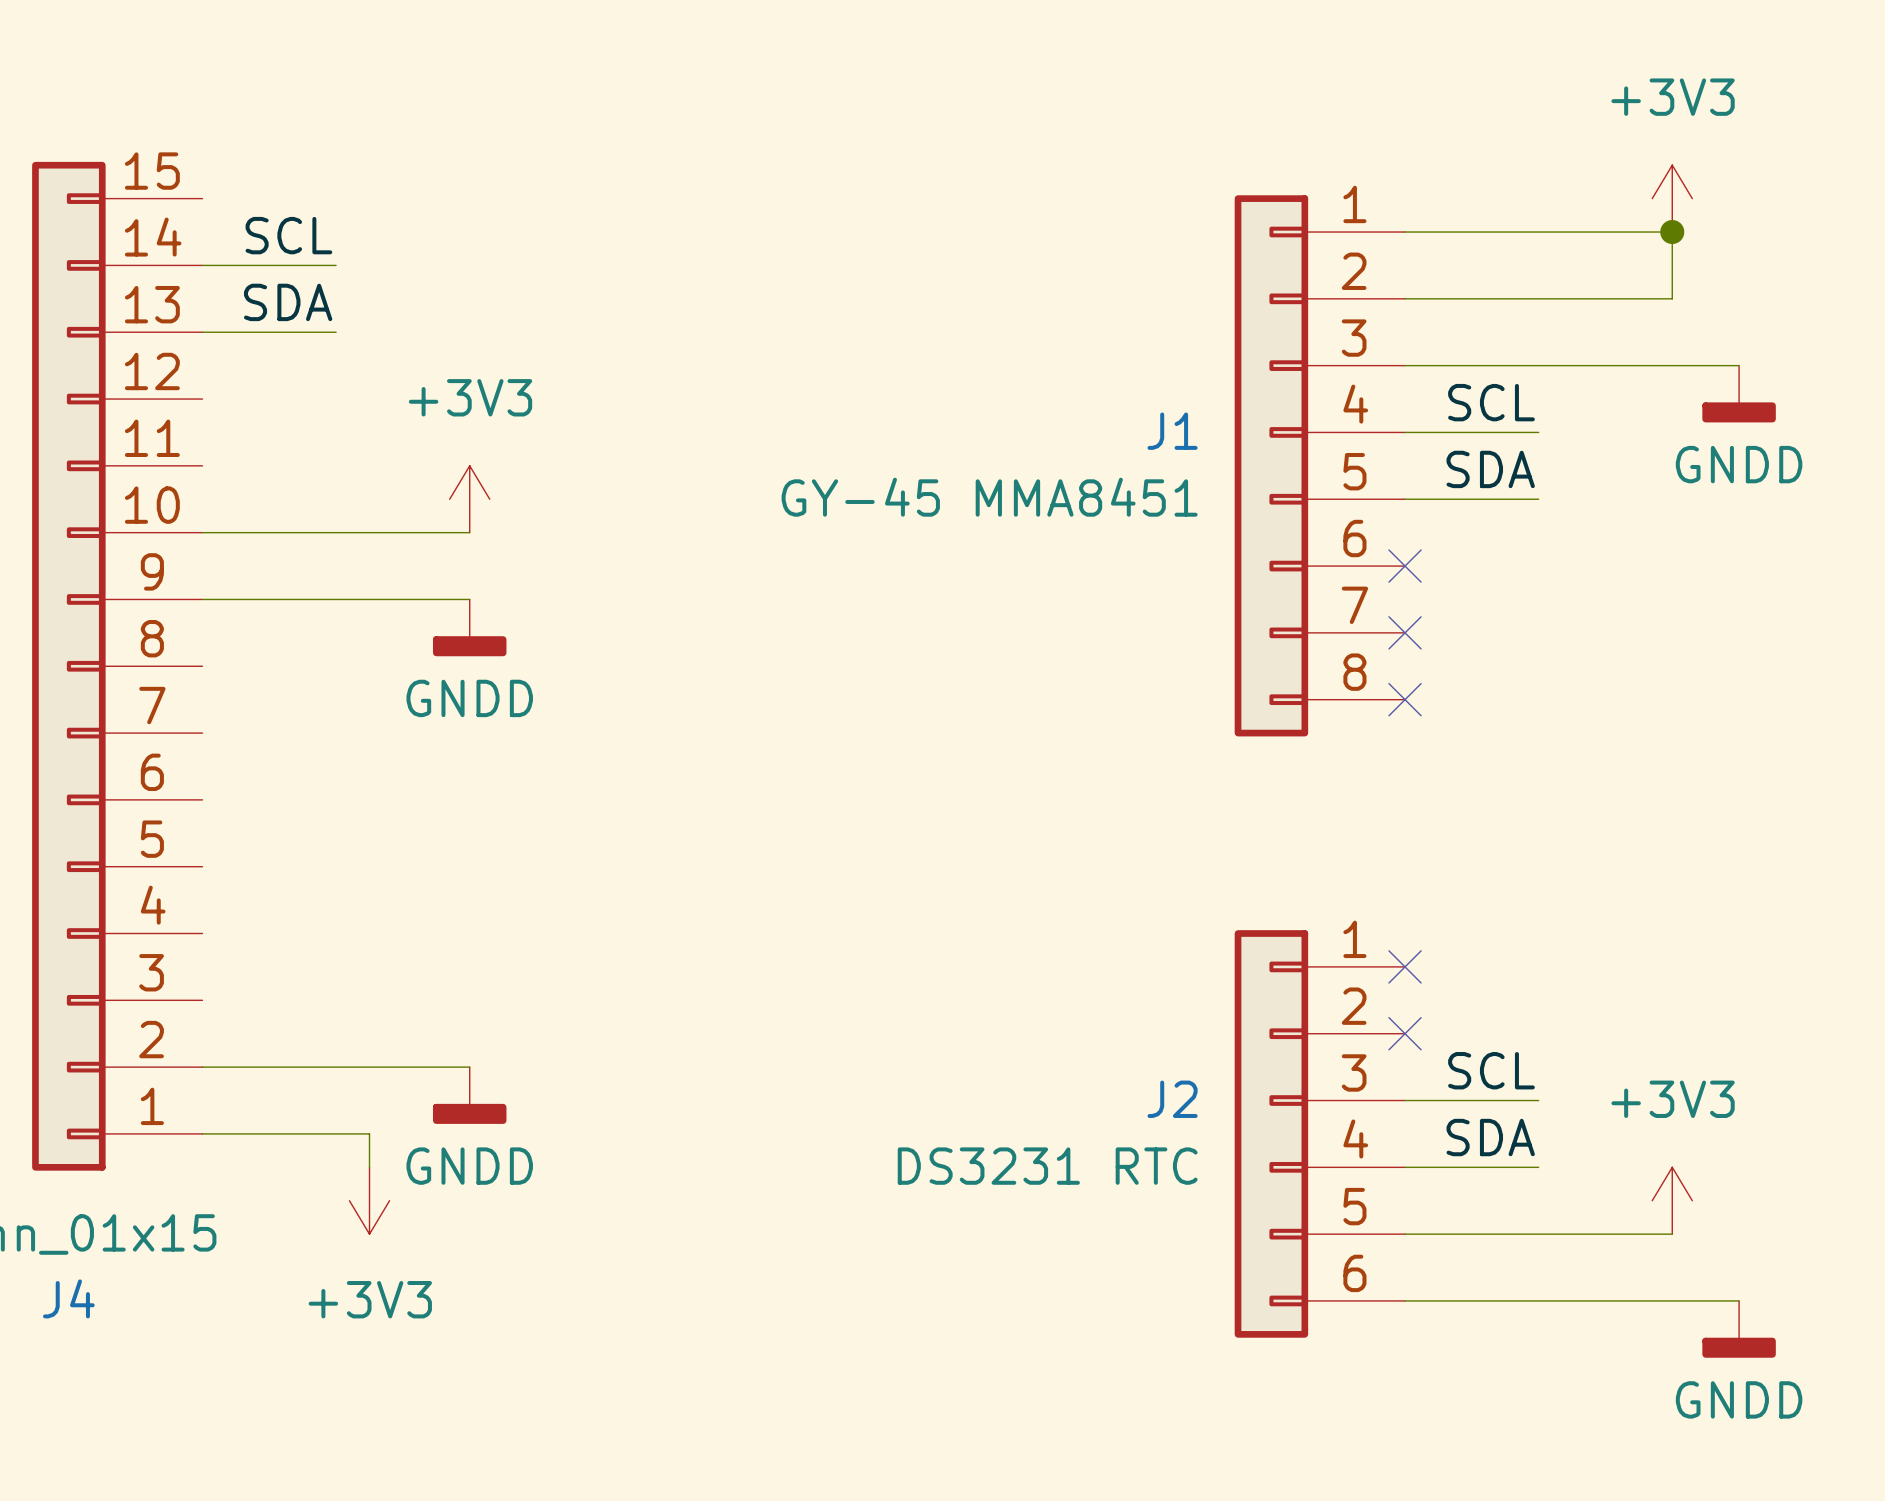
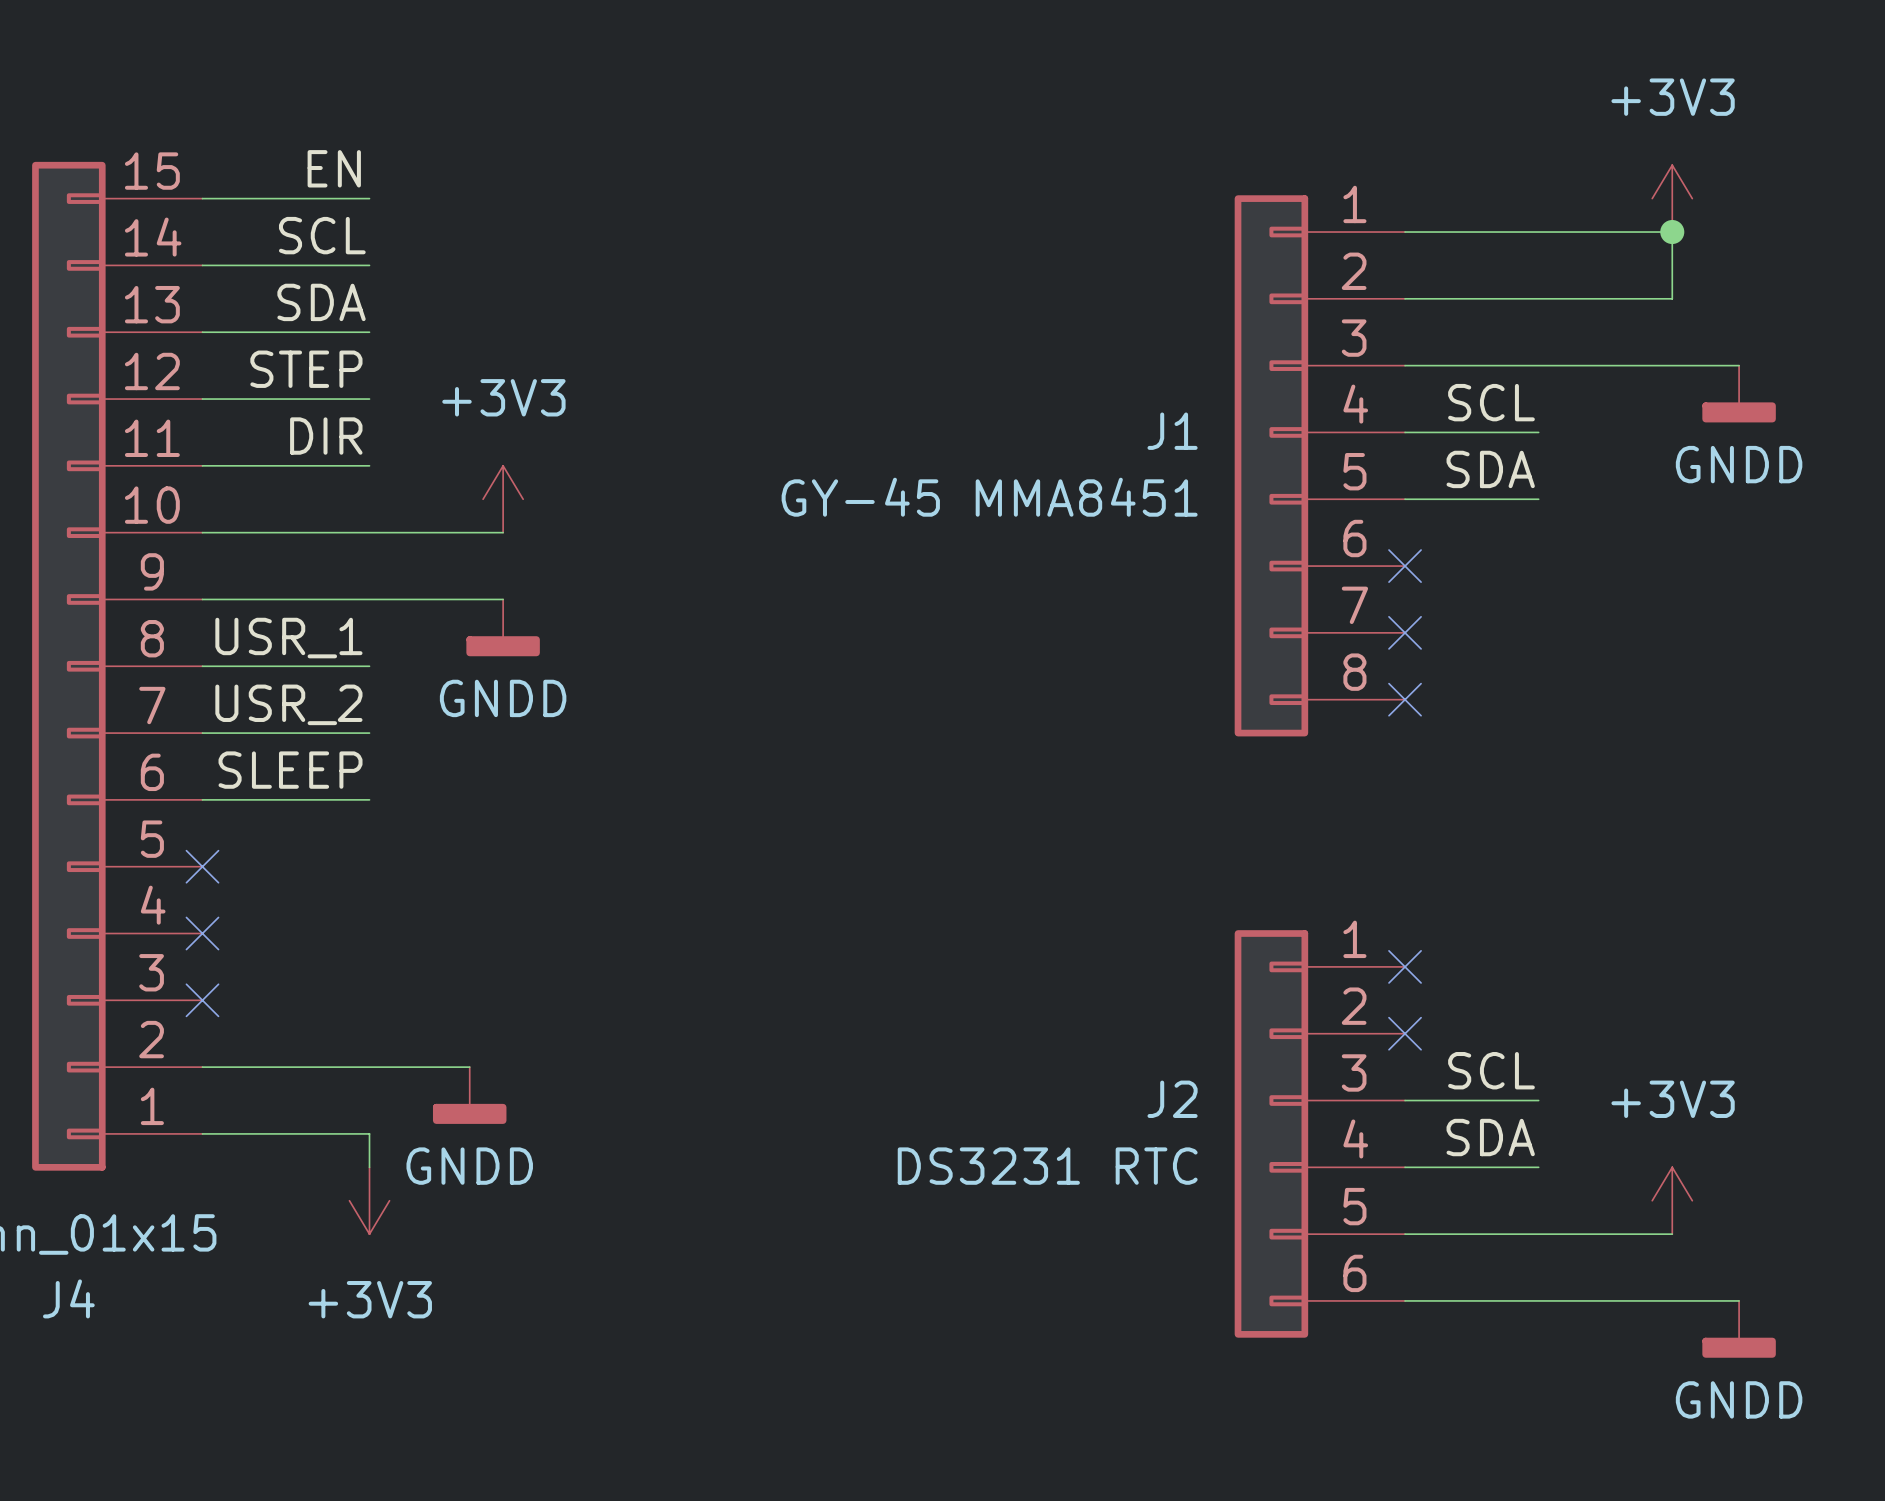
label: none -> EN (334, 168)
wire: none -> (202, 198) (369, 198)
label position: SCL (288, 235) -> SCL (322, 235)
wire: none -> (336, 265) (369, 265)
label position: SDA (288, 302) -> SDA (321, 302)
wire: none -> (336, 332) (369, 332)
label: none -> STEP (306, 369)
wire: none -> (202, 399) (369, 399)
label: none -> DIR (326, 436)
wire: none -> (202, 465) (369, 465)
power symbol position: +3V3 (469, 499) -> +3V3 (503, 499)
wire: none -> (469, 532) (503, 532)
wire: none -> (469, 599) (503, 599)
power symbol position: GNDD (469, 627) -> GNDD (503, 627)
label: none -> USR_1 (288, 638)
wire: none -> (202, 666) (369, 666)
label: none -> USR_2 (288, 704)
wire: none -> (202, 733) (369, 733)
label: none -> SLEEP (290, 770)
wire: none -> (202, 799) (369, 799)
no-connect mark: none -> (202, 866)
no-connect mark: none -> (202, 933)
no-connect mark: none -> (202, 1000)

